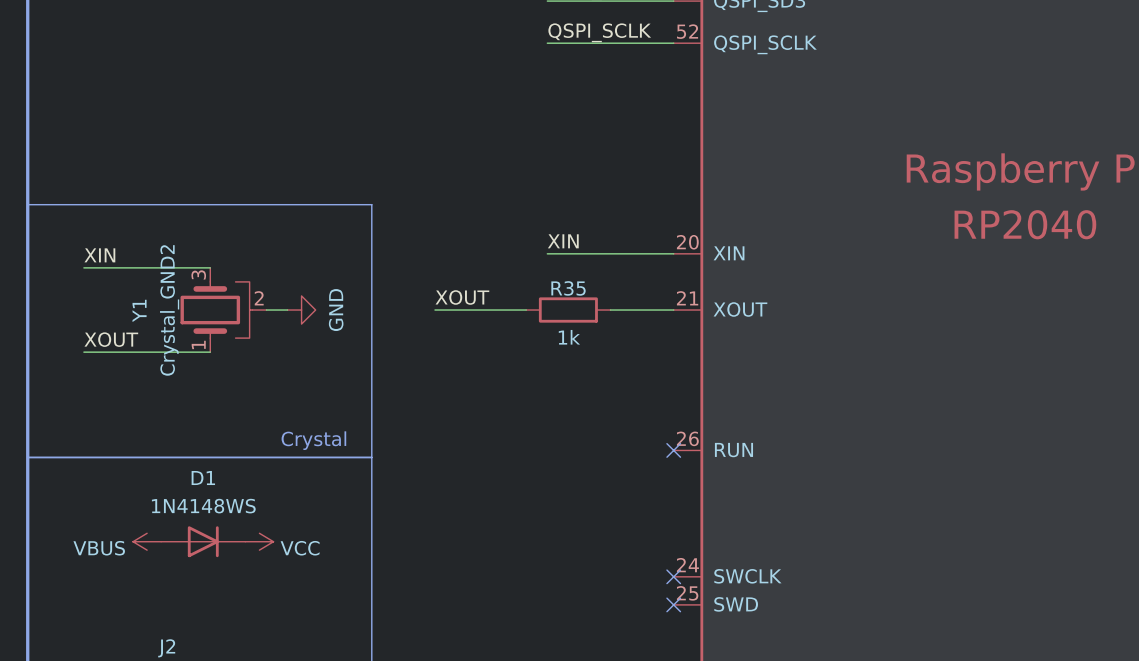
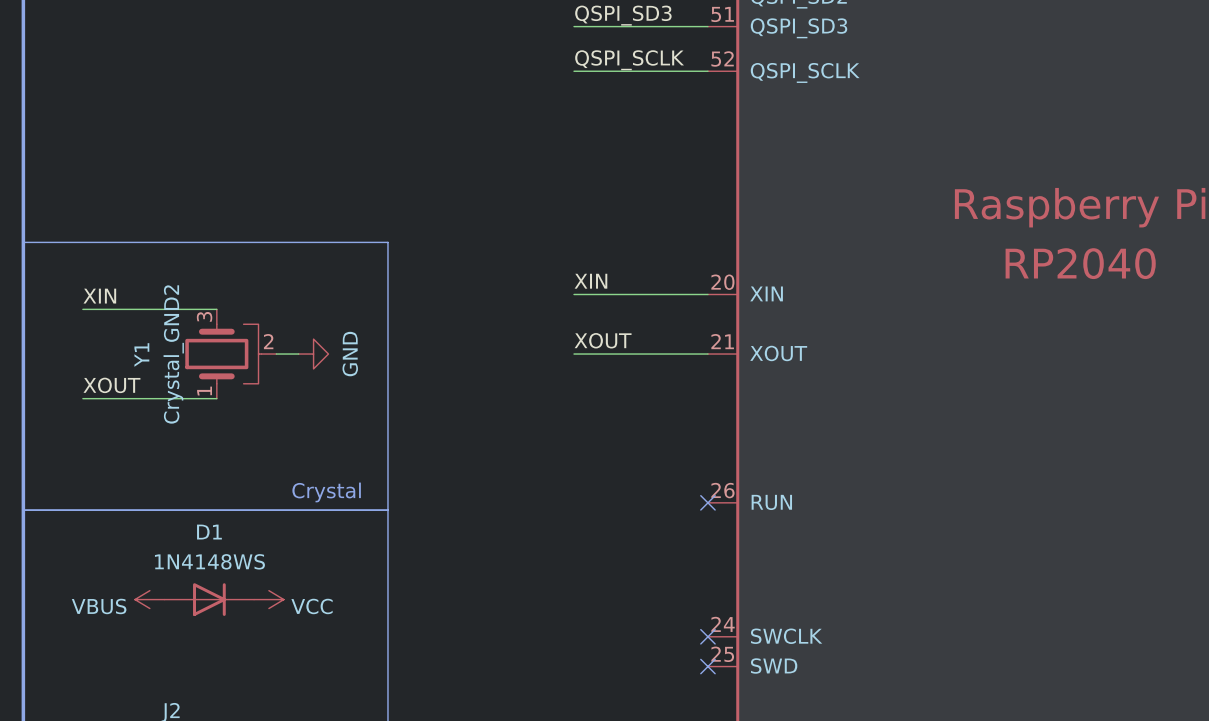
label position: XOUT (462, 297) -> XOUT (603, 340)
wire: (434, 310) (526, 310) -> none
wire: none -> (574, 354) (640, 354)
R35: 1k (568, 310) -> none

